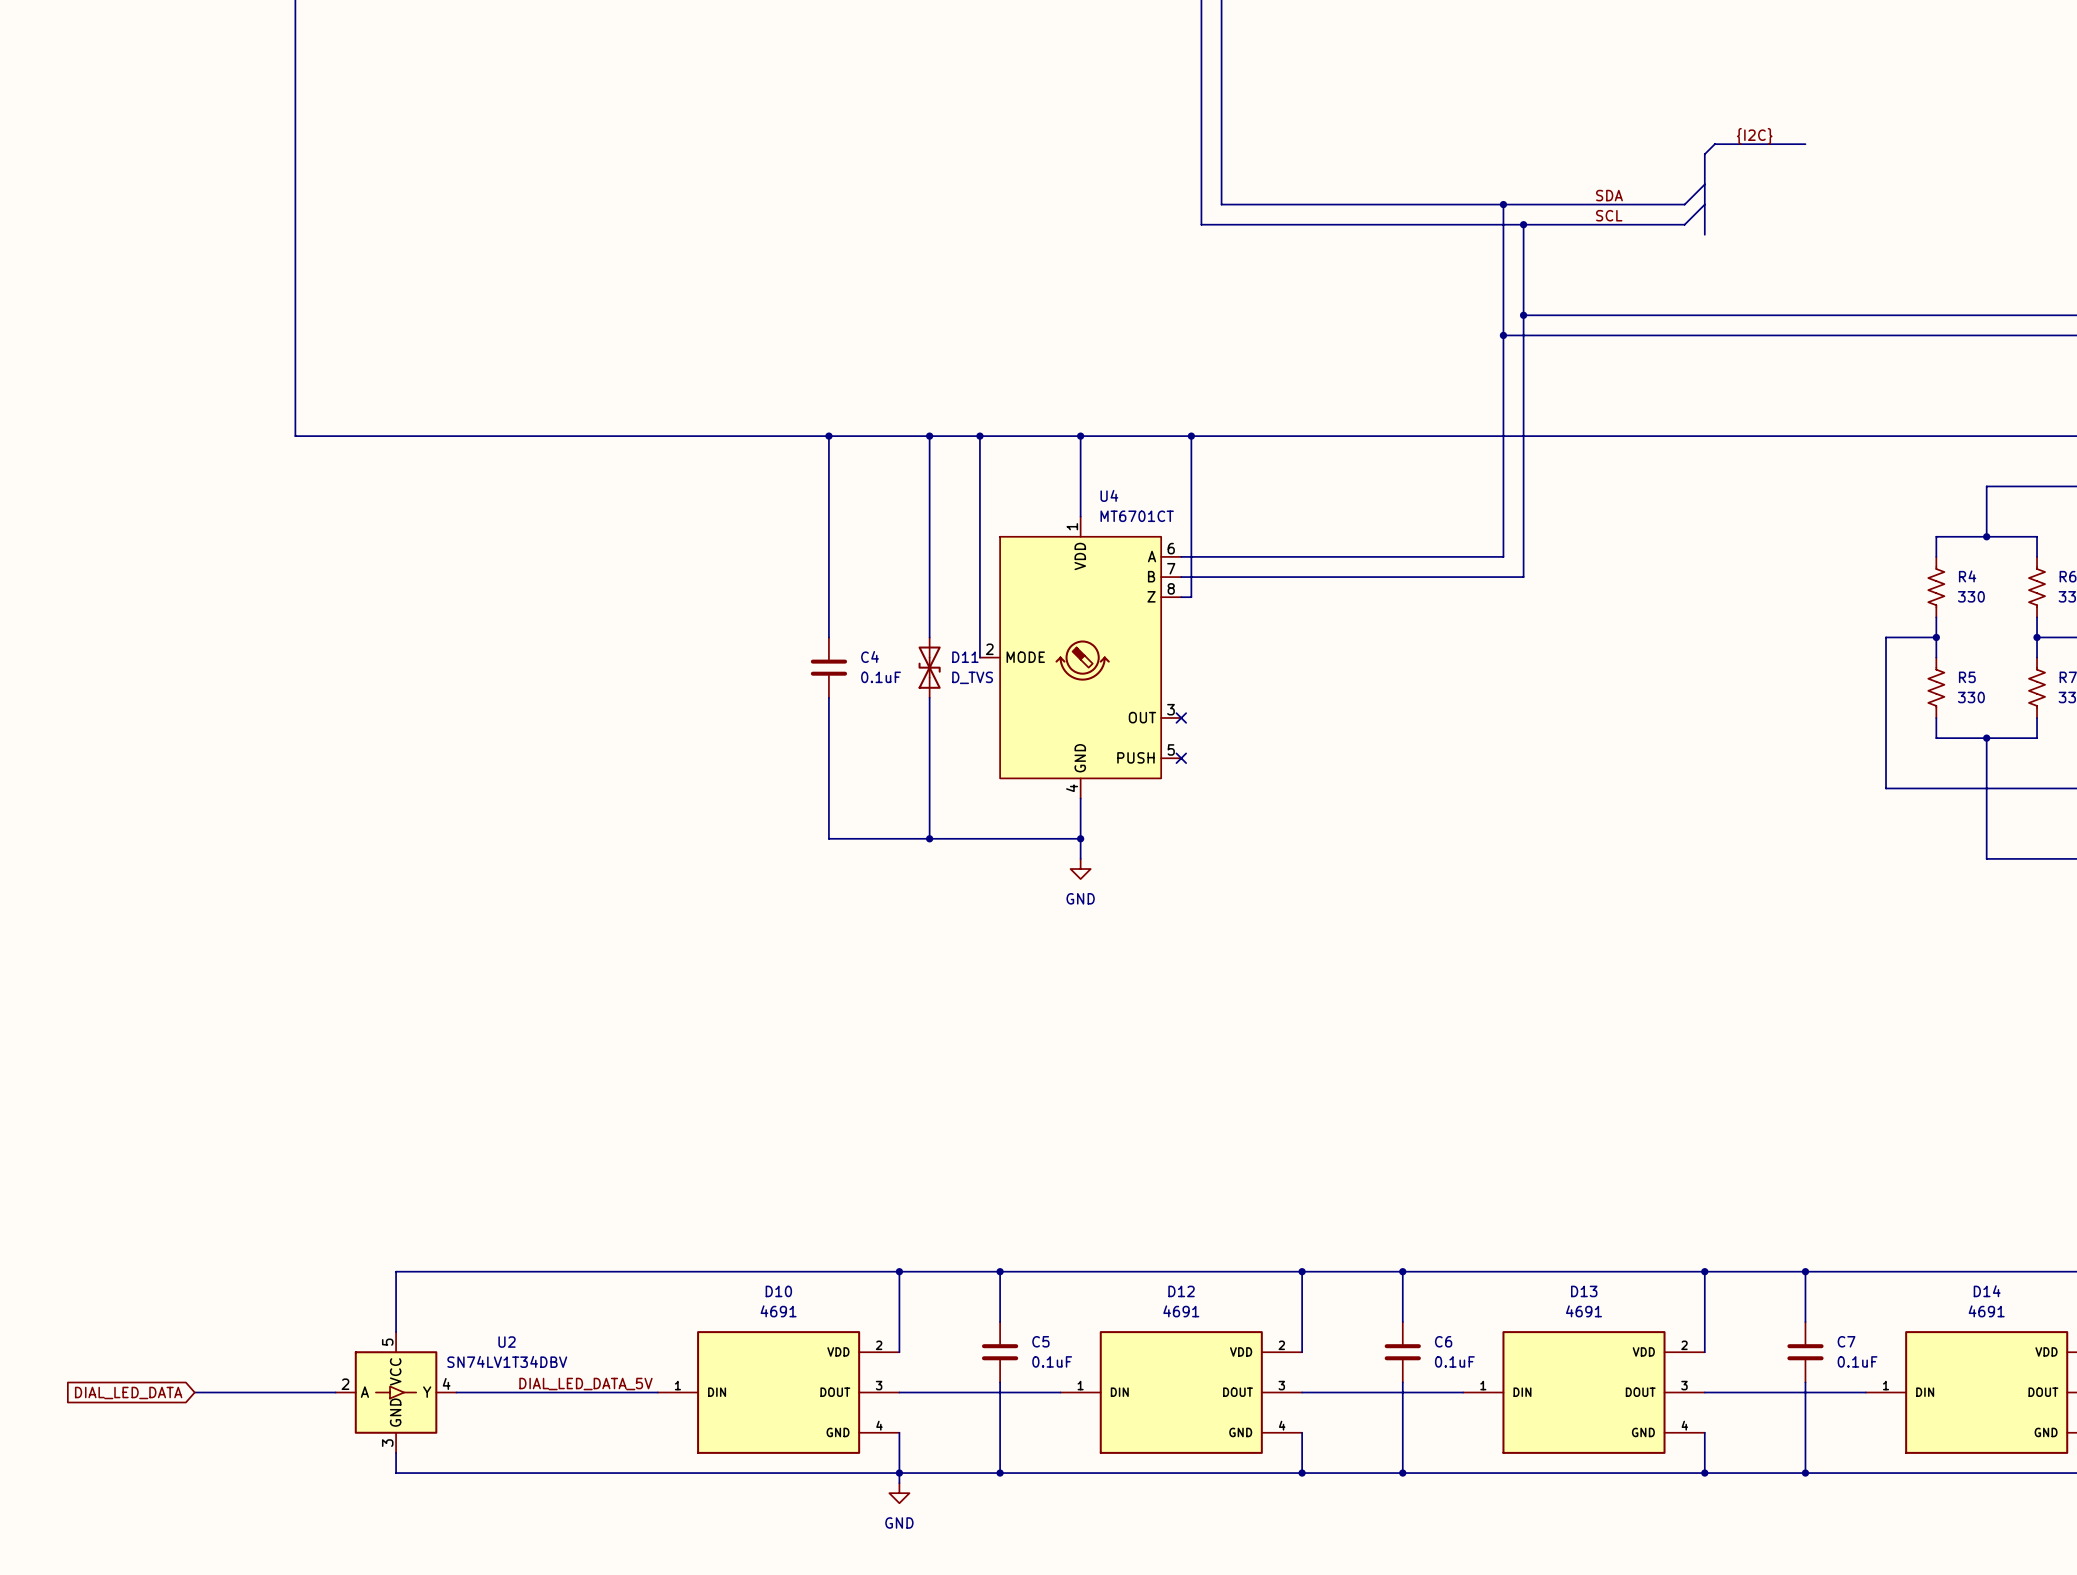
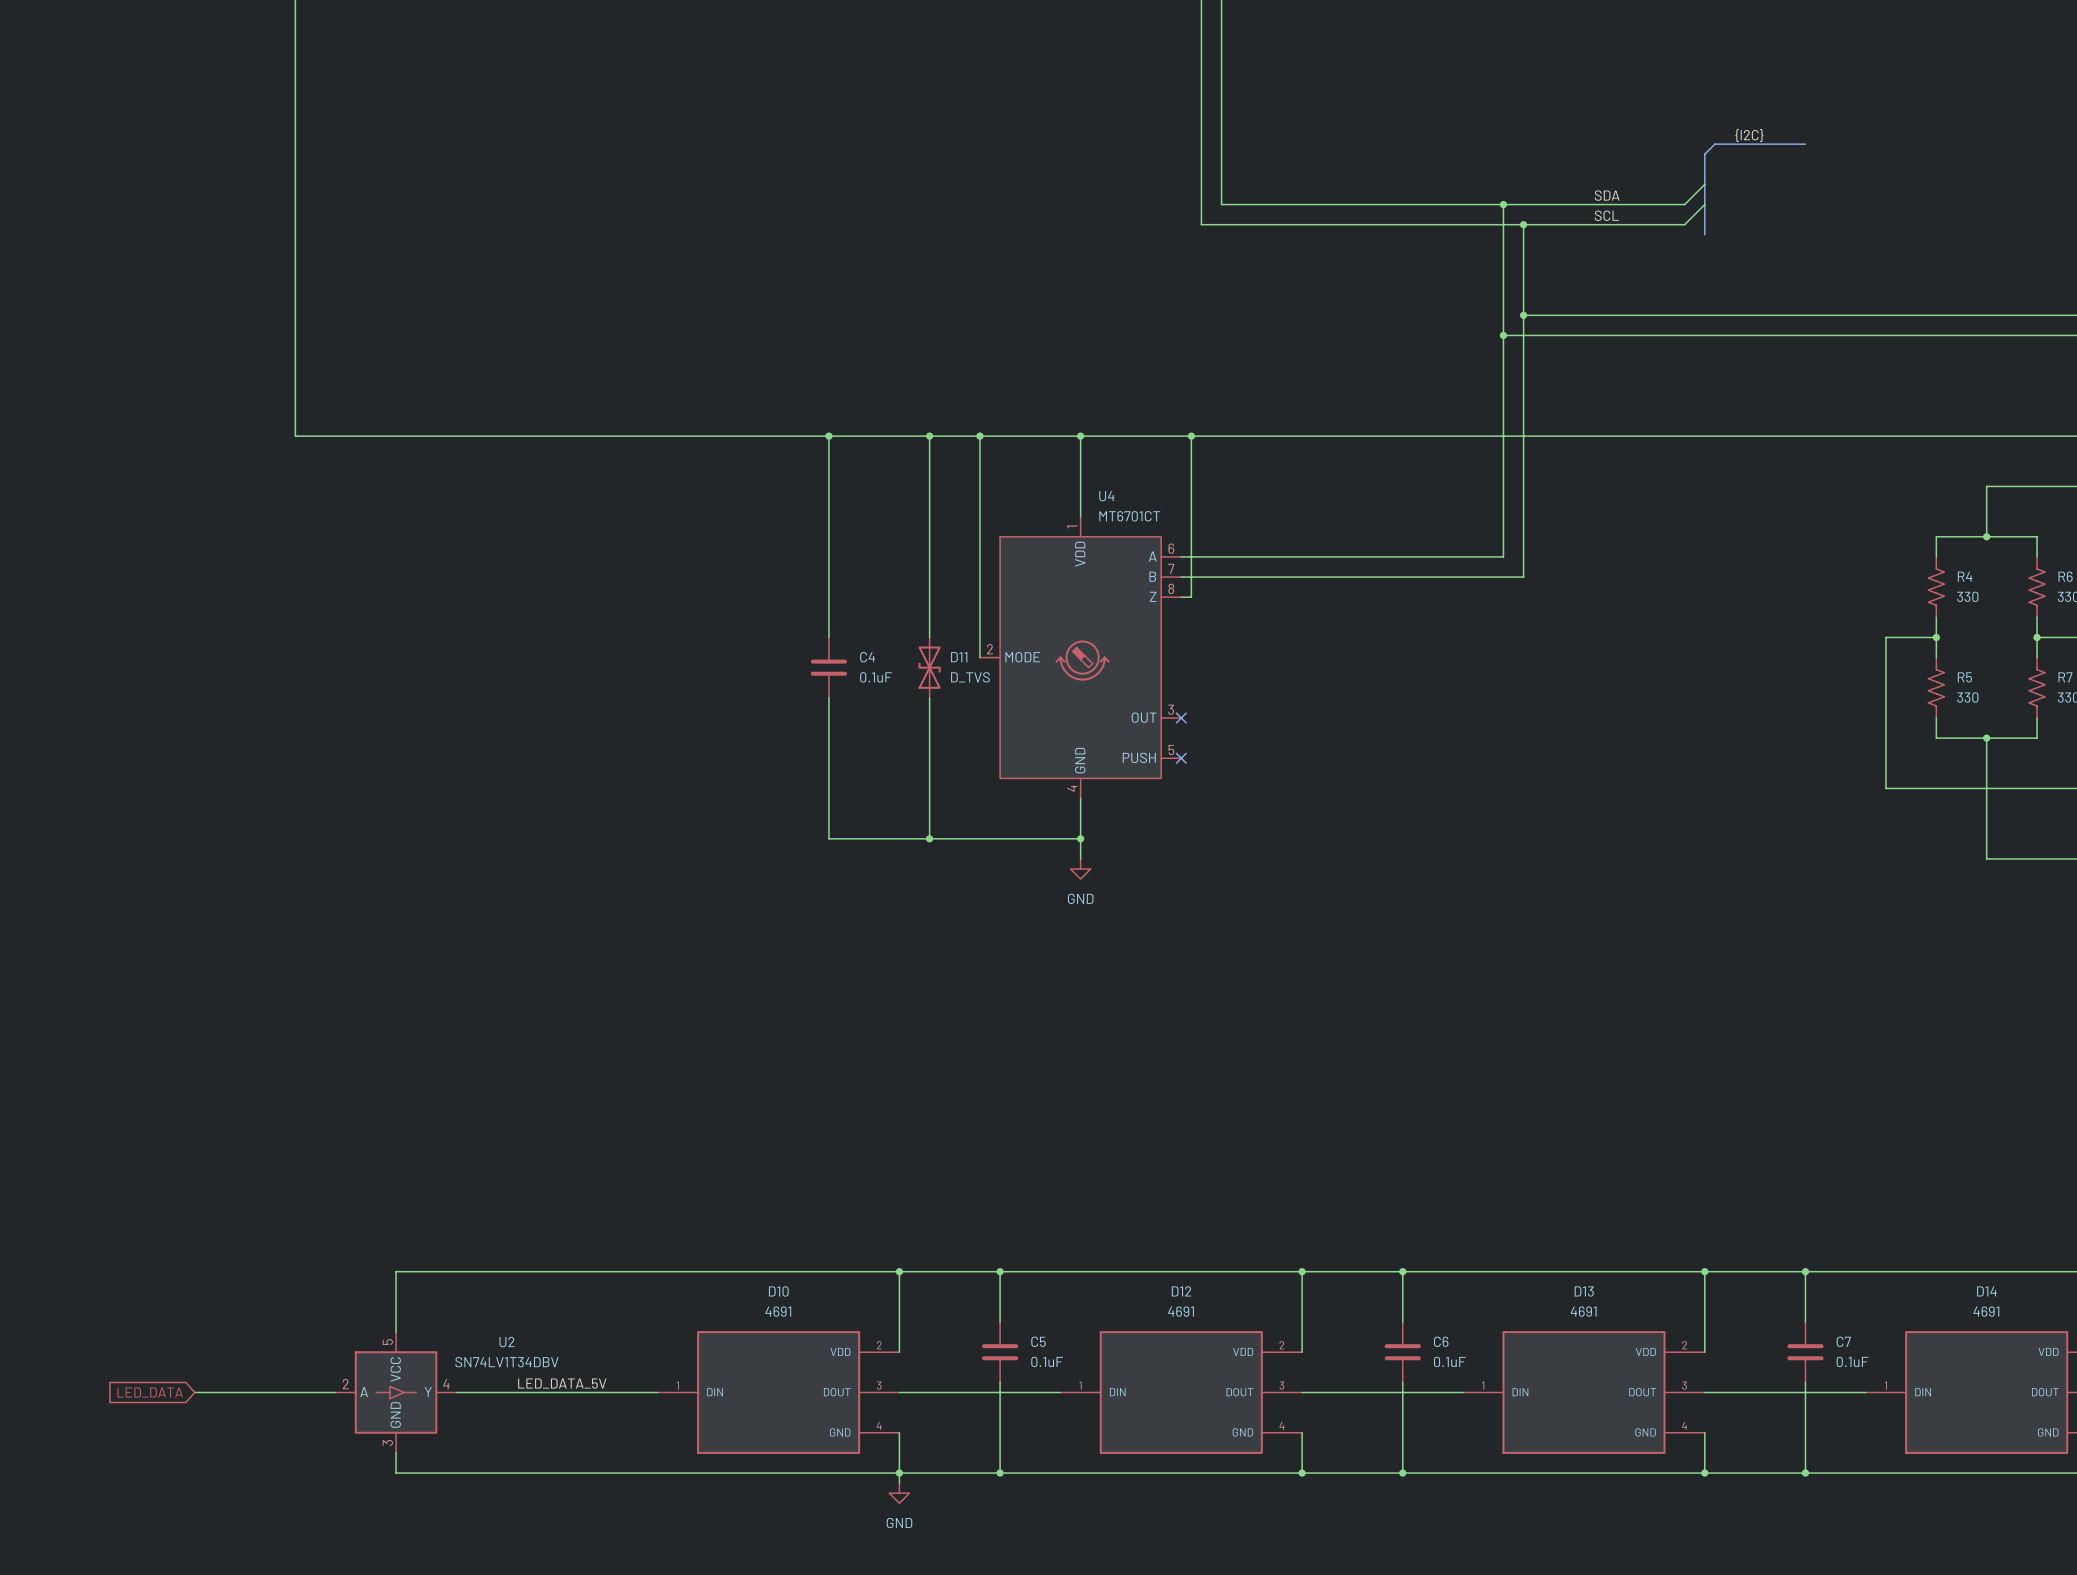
label: DIAL_LED_DATA_5V (585, 1383) -> LED_DATA_5V (562, 1383)
global label: DIAL_LED_DATA (128, 1392) -> LED_DATA (150, 1392)

